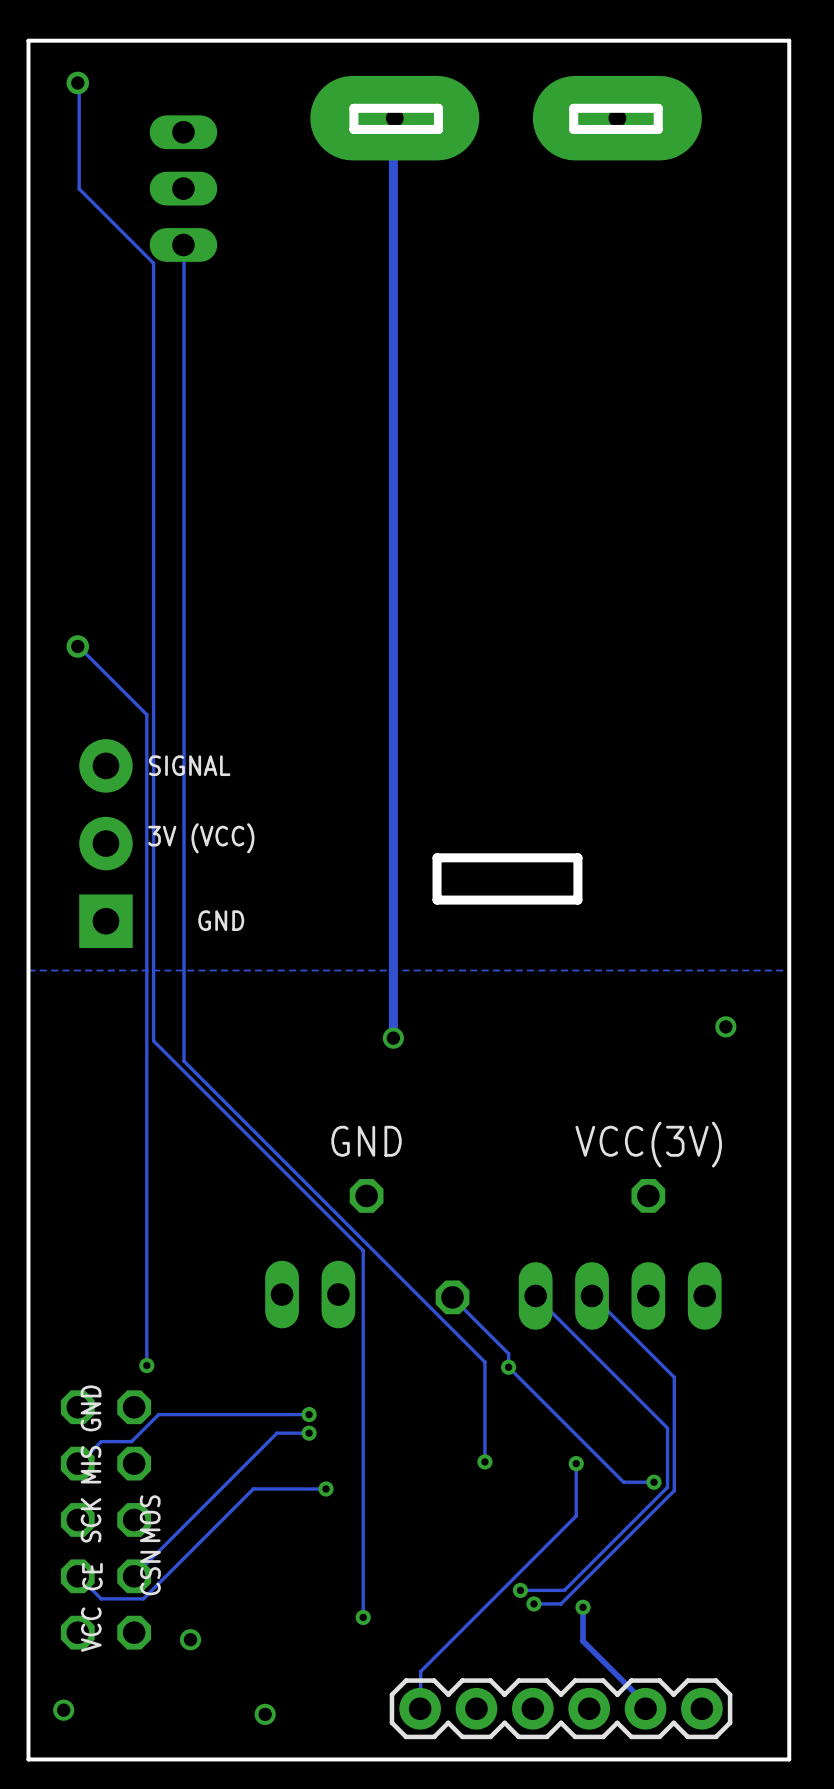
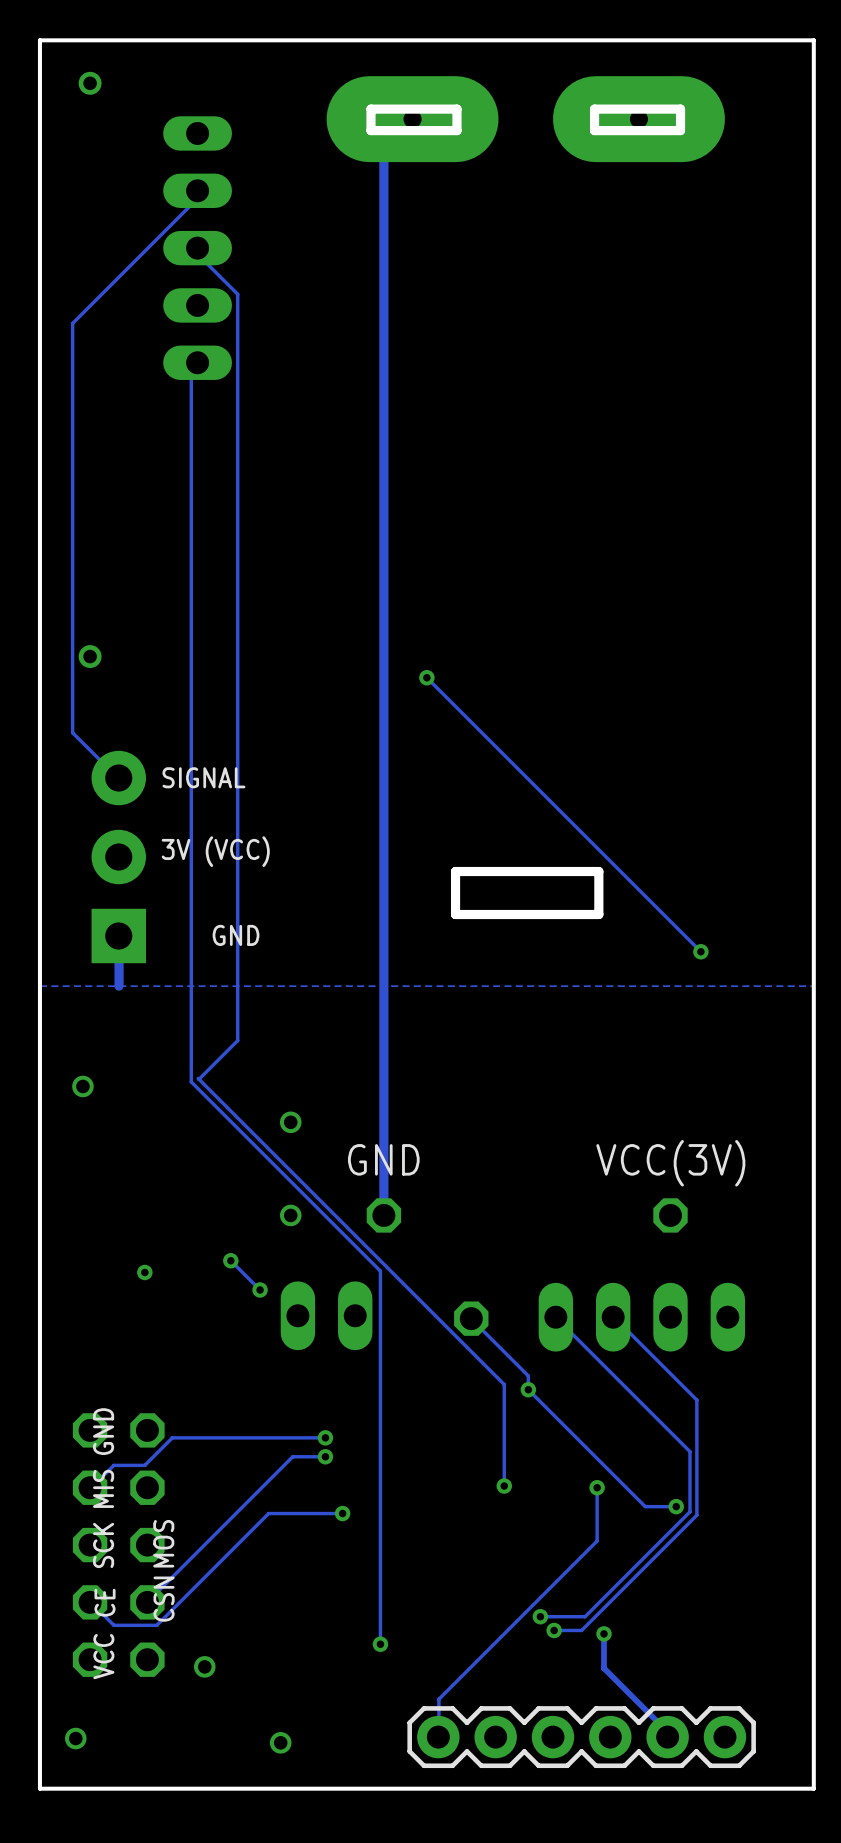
track: (77, 82) (79, 188) (153, 263) (153, 1040) (177, 1064) -> (197, 362) (191, 368) (191, 1081)
track: (394, 118) (393, 1038) -> (412, 119) (383, 119) (383, 1215)
track: none -> (197, 190) (196, 199) (72, 323) (72, 732) (118, 778)
track: none -> (197, 248) (198, 254) (237, 294) (237, 1040) (199, 1079)
track: (184, 249) (184, 1061) -> none
part: none -> (197, 334)
track: (77, 646) (146, 714) (146, 1365) -> none
track: none -> (426, 677) (700, 951)
via: none -> (426, 677)
track: none -> (118, 936) (119, 986)
via: none -> (700, 951)
via: (725, 1026) -> none
via: (393, 1038) -> none
via: none -> (82, 1086)
via: none -> (290, 1122)
via: none -> (290, 1215)
track: none -> (230, 1260) (260, 1289)
via: none -> (230, 1260)
via: none -> (144, 1272)
via: none -> (260, 1289)
via: (146, 1365) -> none

